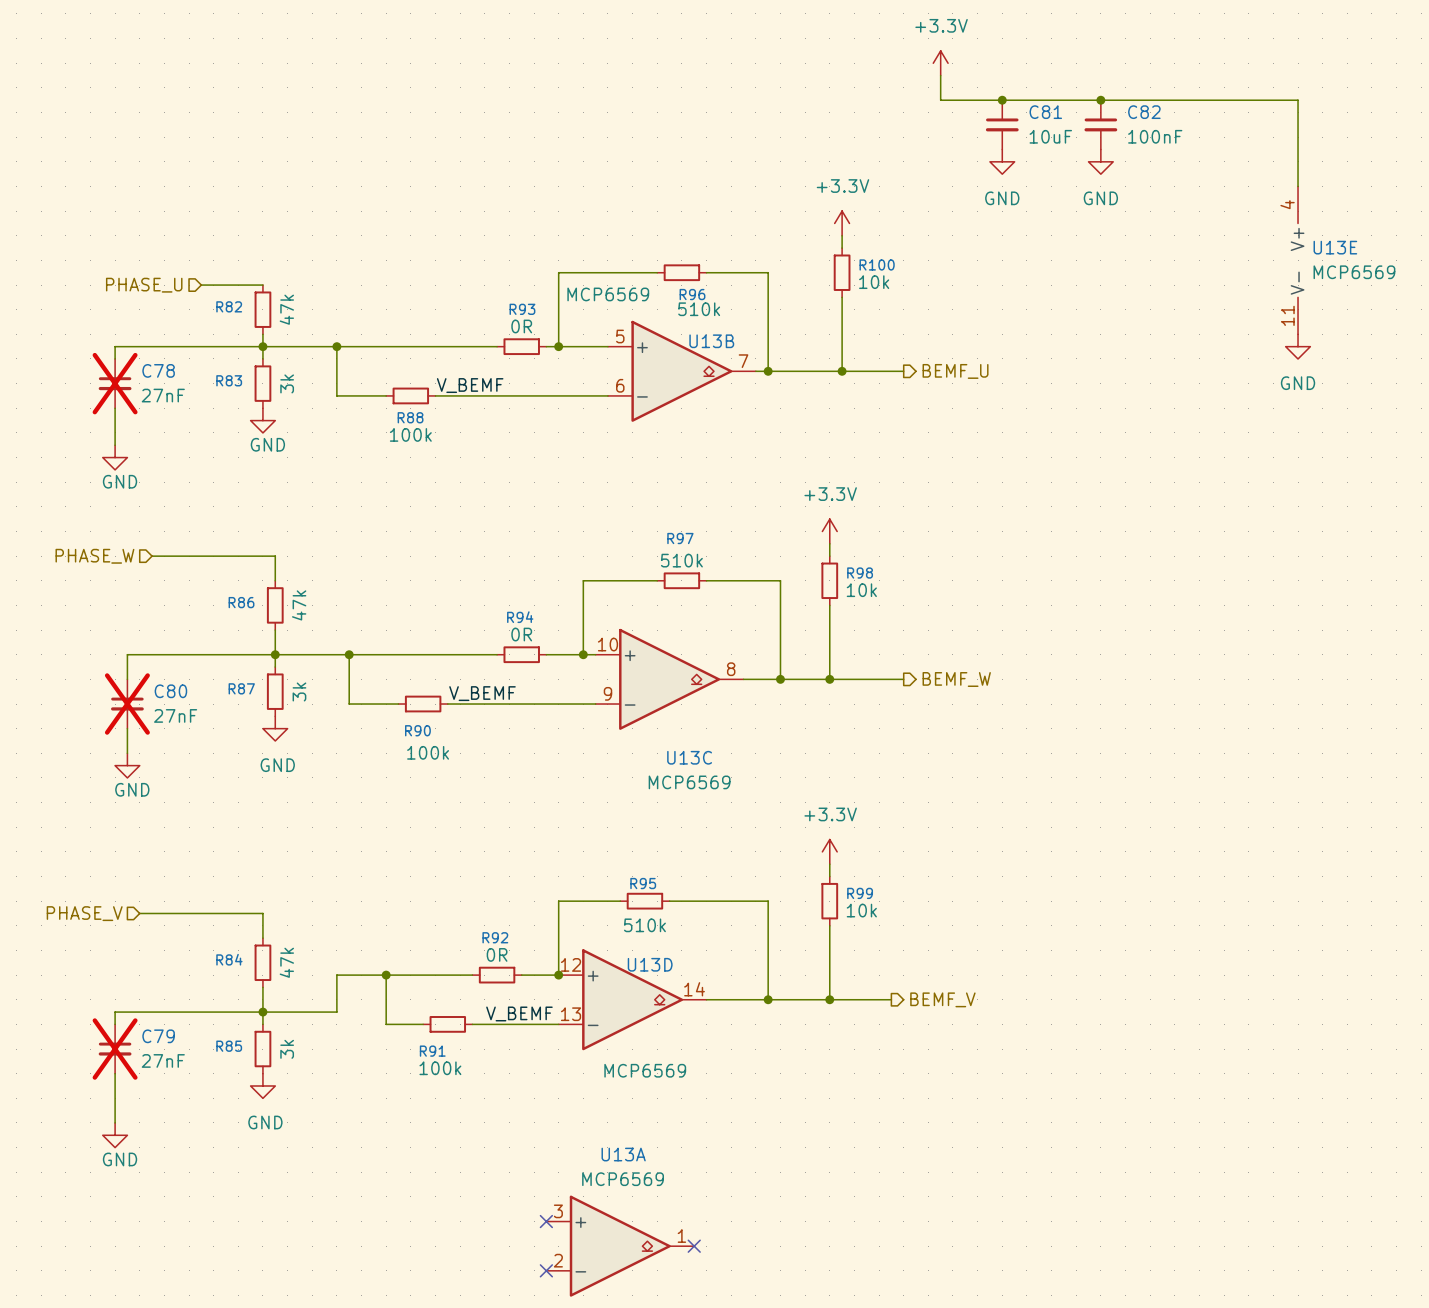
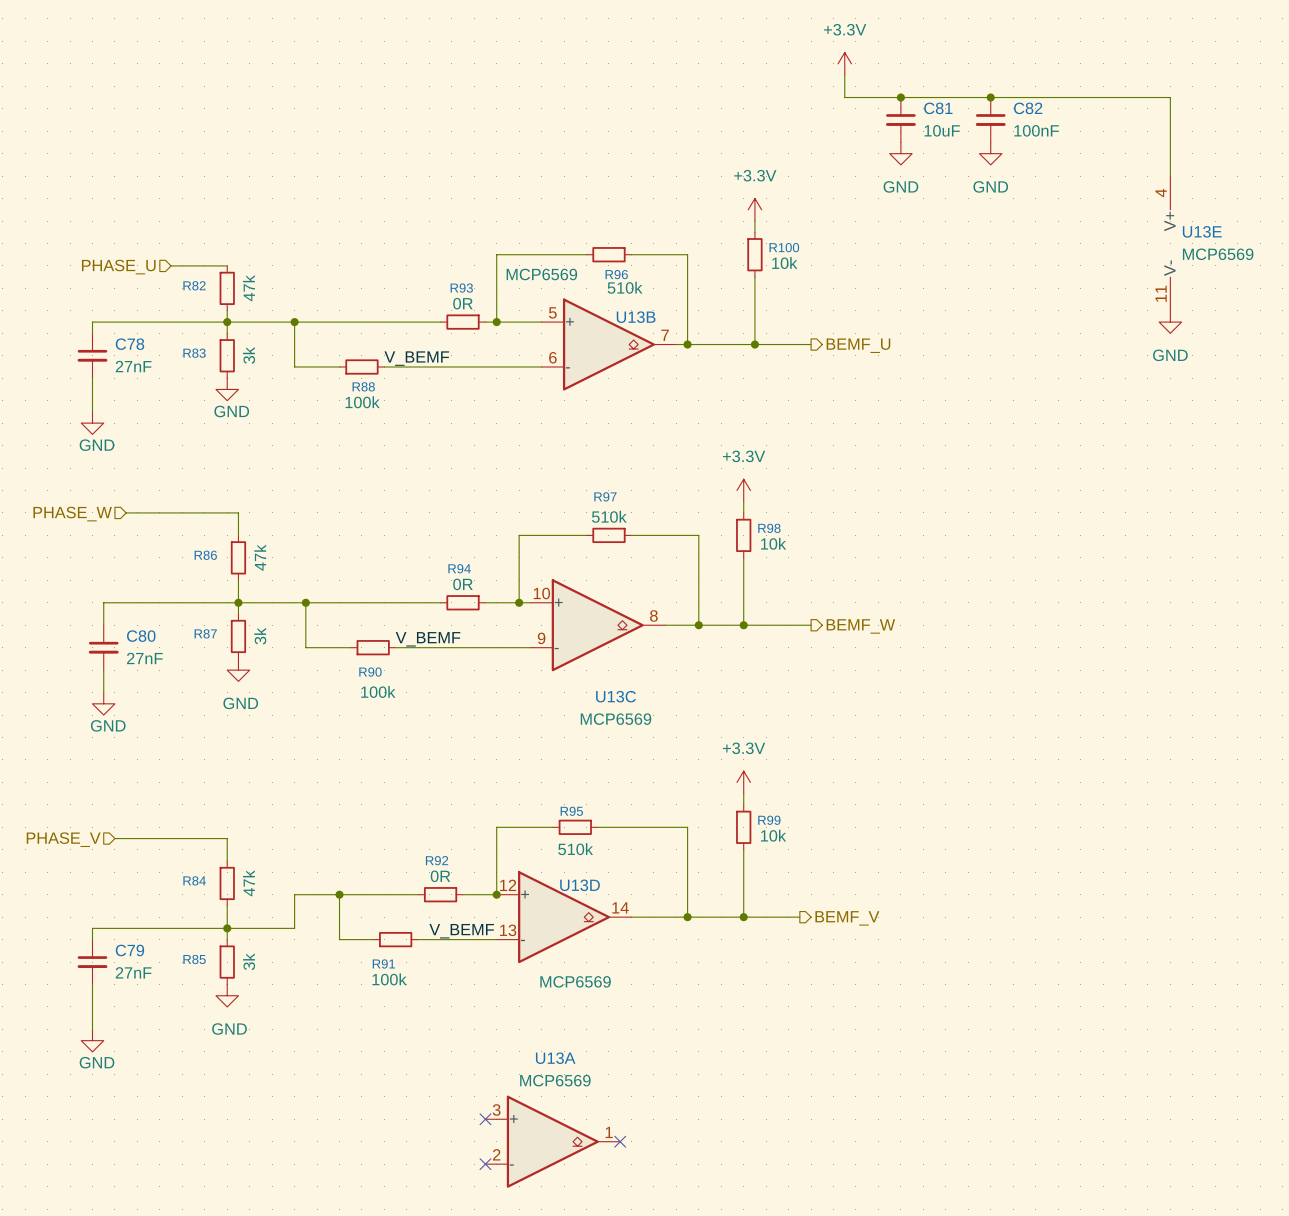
C78 do-not-place cross: (115, 383) -> none
C80 do-not-place cross: (127, 704) -> none
C79 do-not-place cross: (115, 1049) -> none

